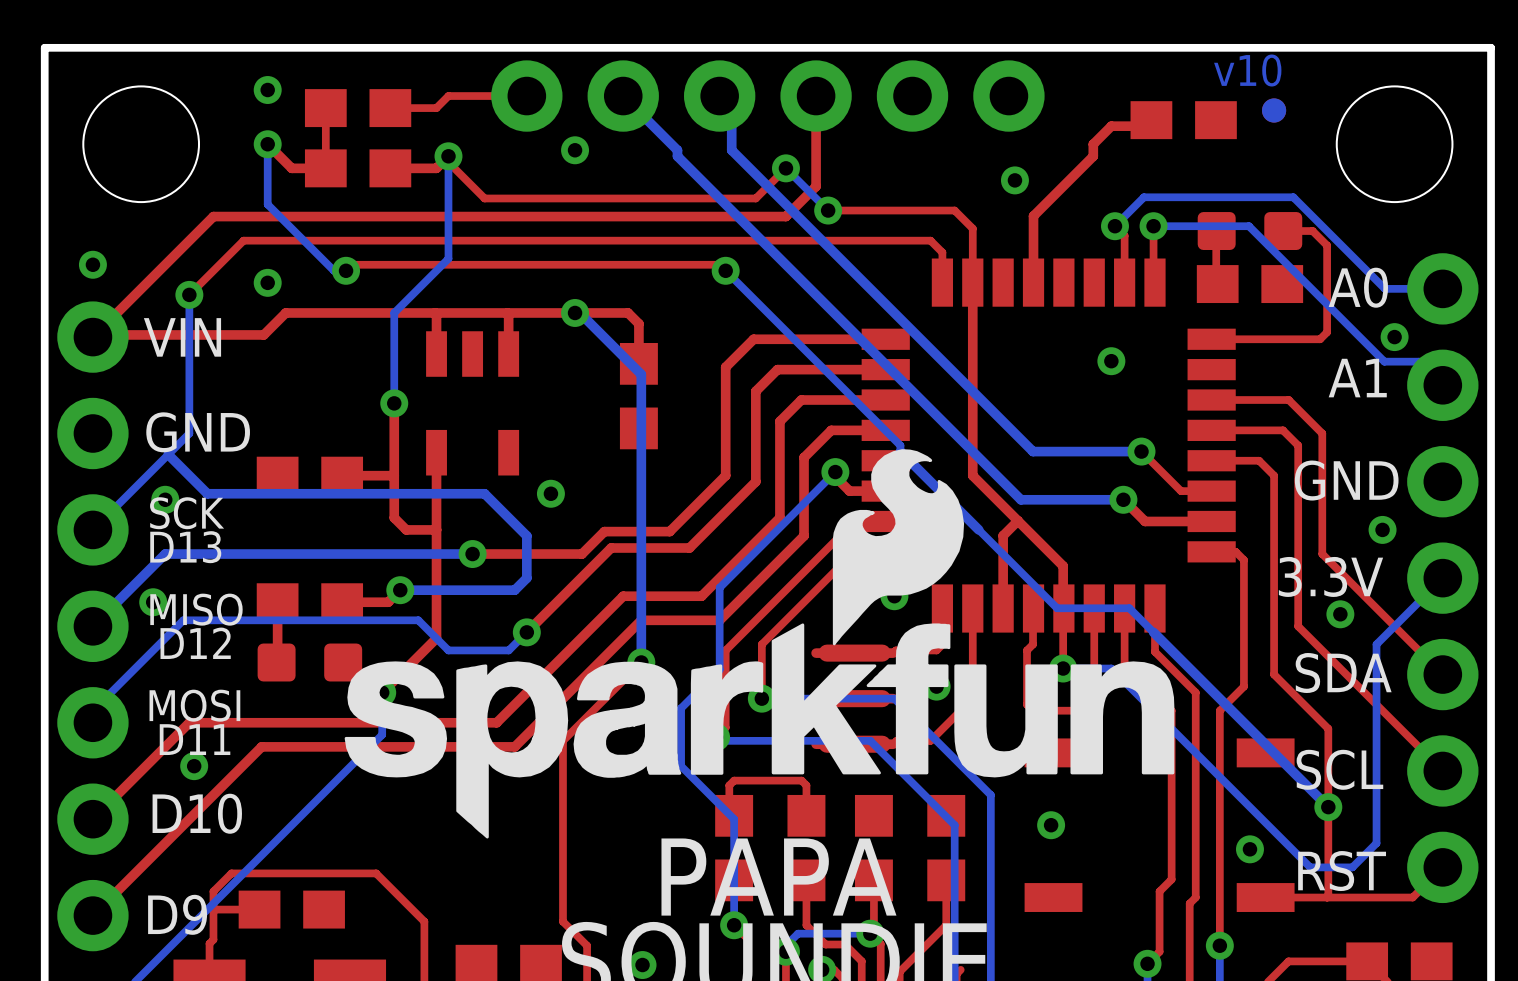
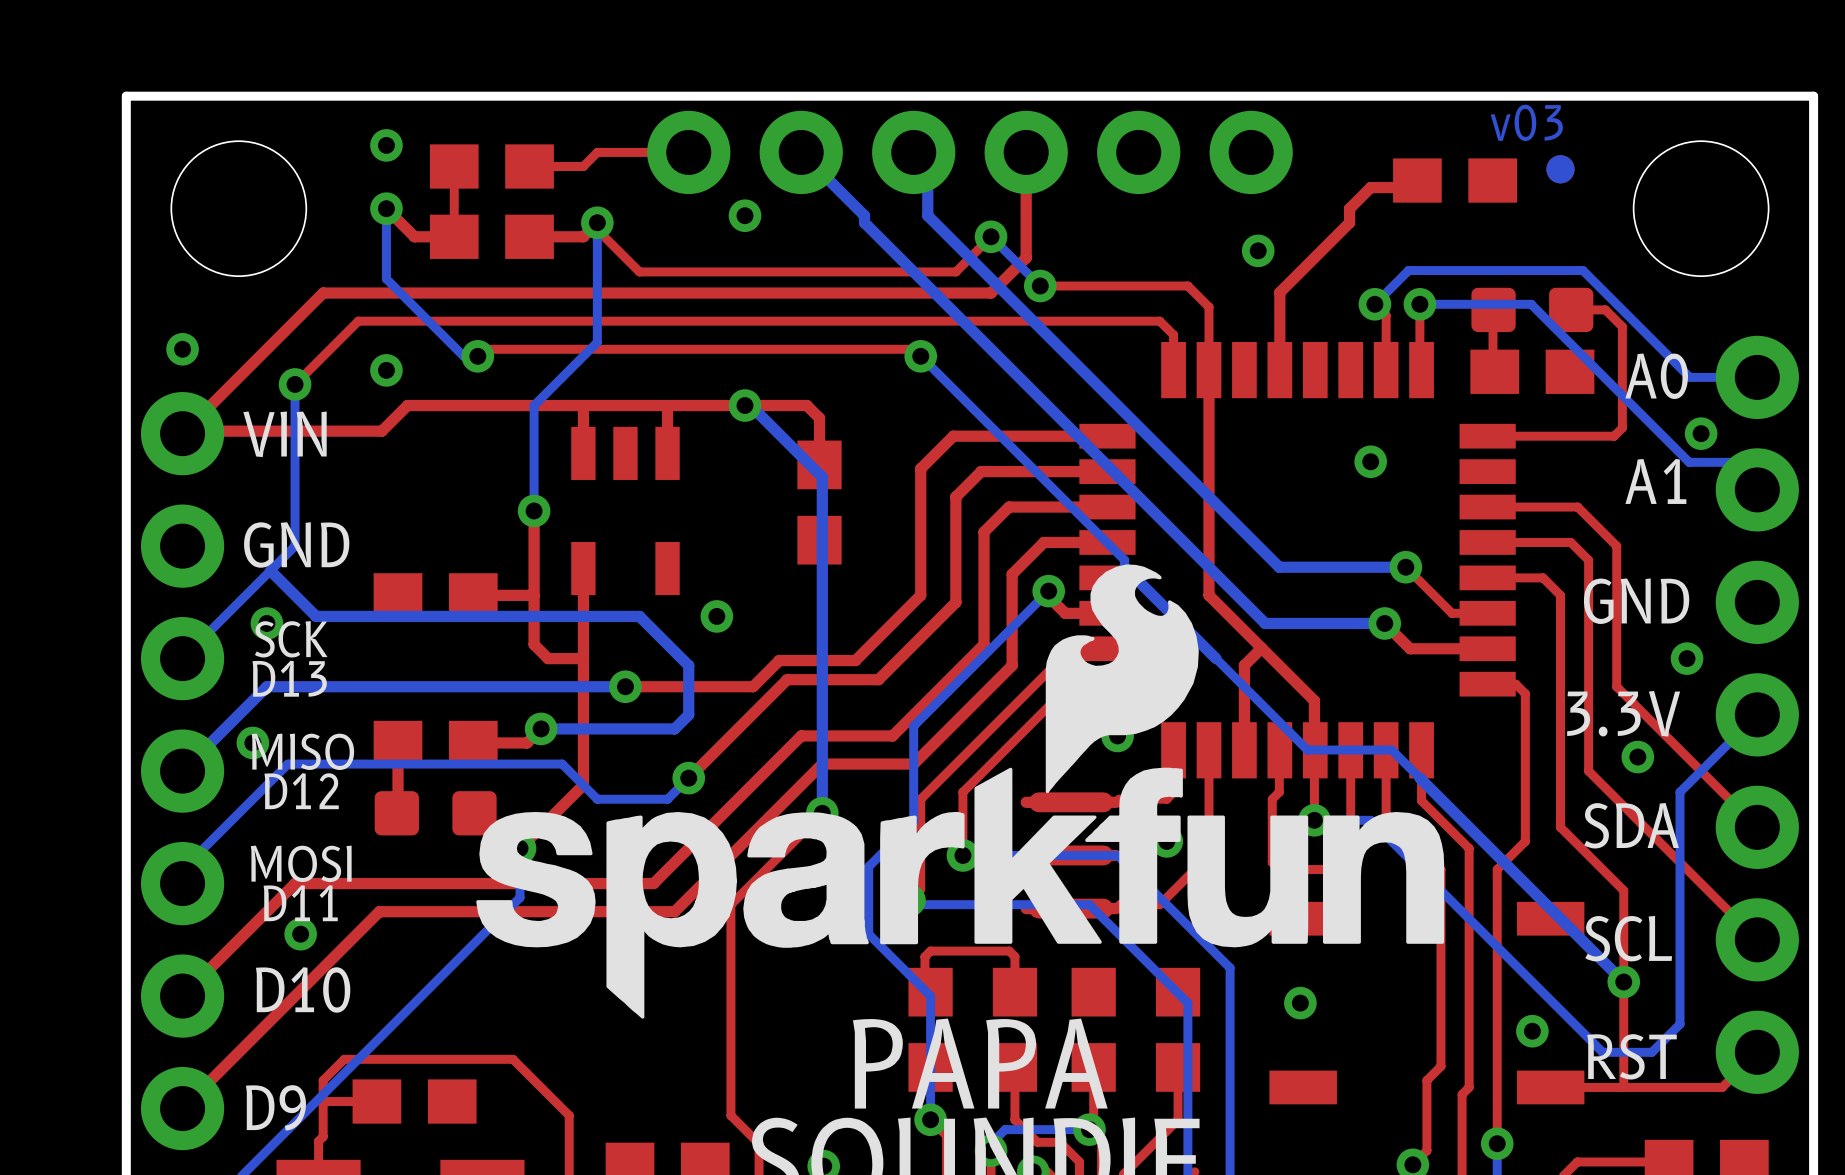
text: v10 (1247, 70) -> v03 (1526, 122)

